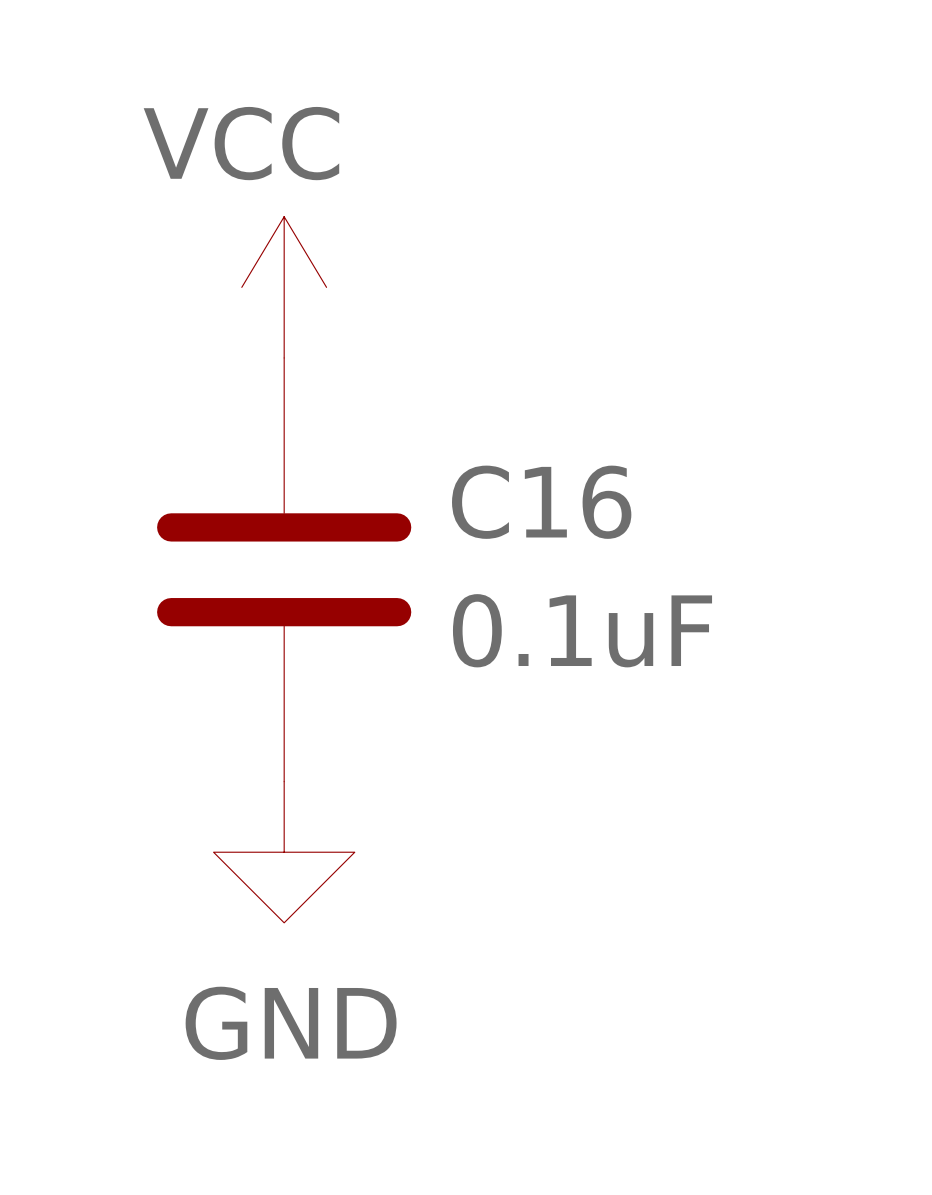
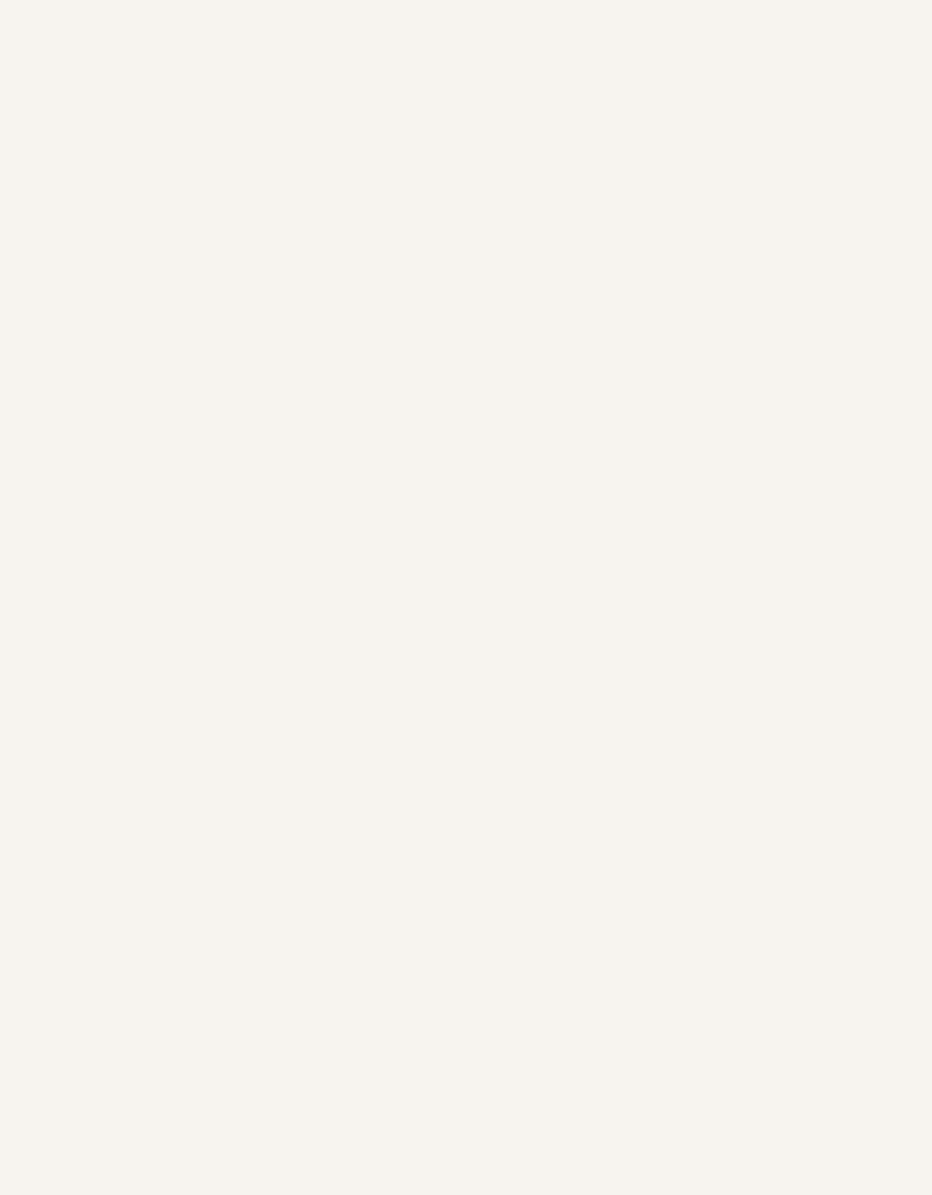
power symbol: VCC (284, 287) -> none
C16: 0.1uF (284, 569) -> none
power symbol: GND (284, 852) -> none

